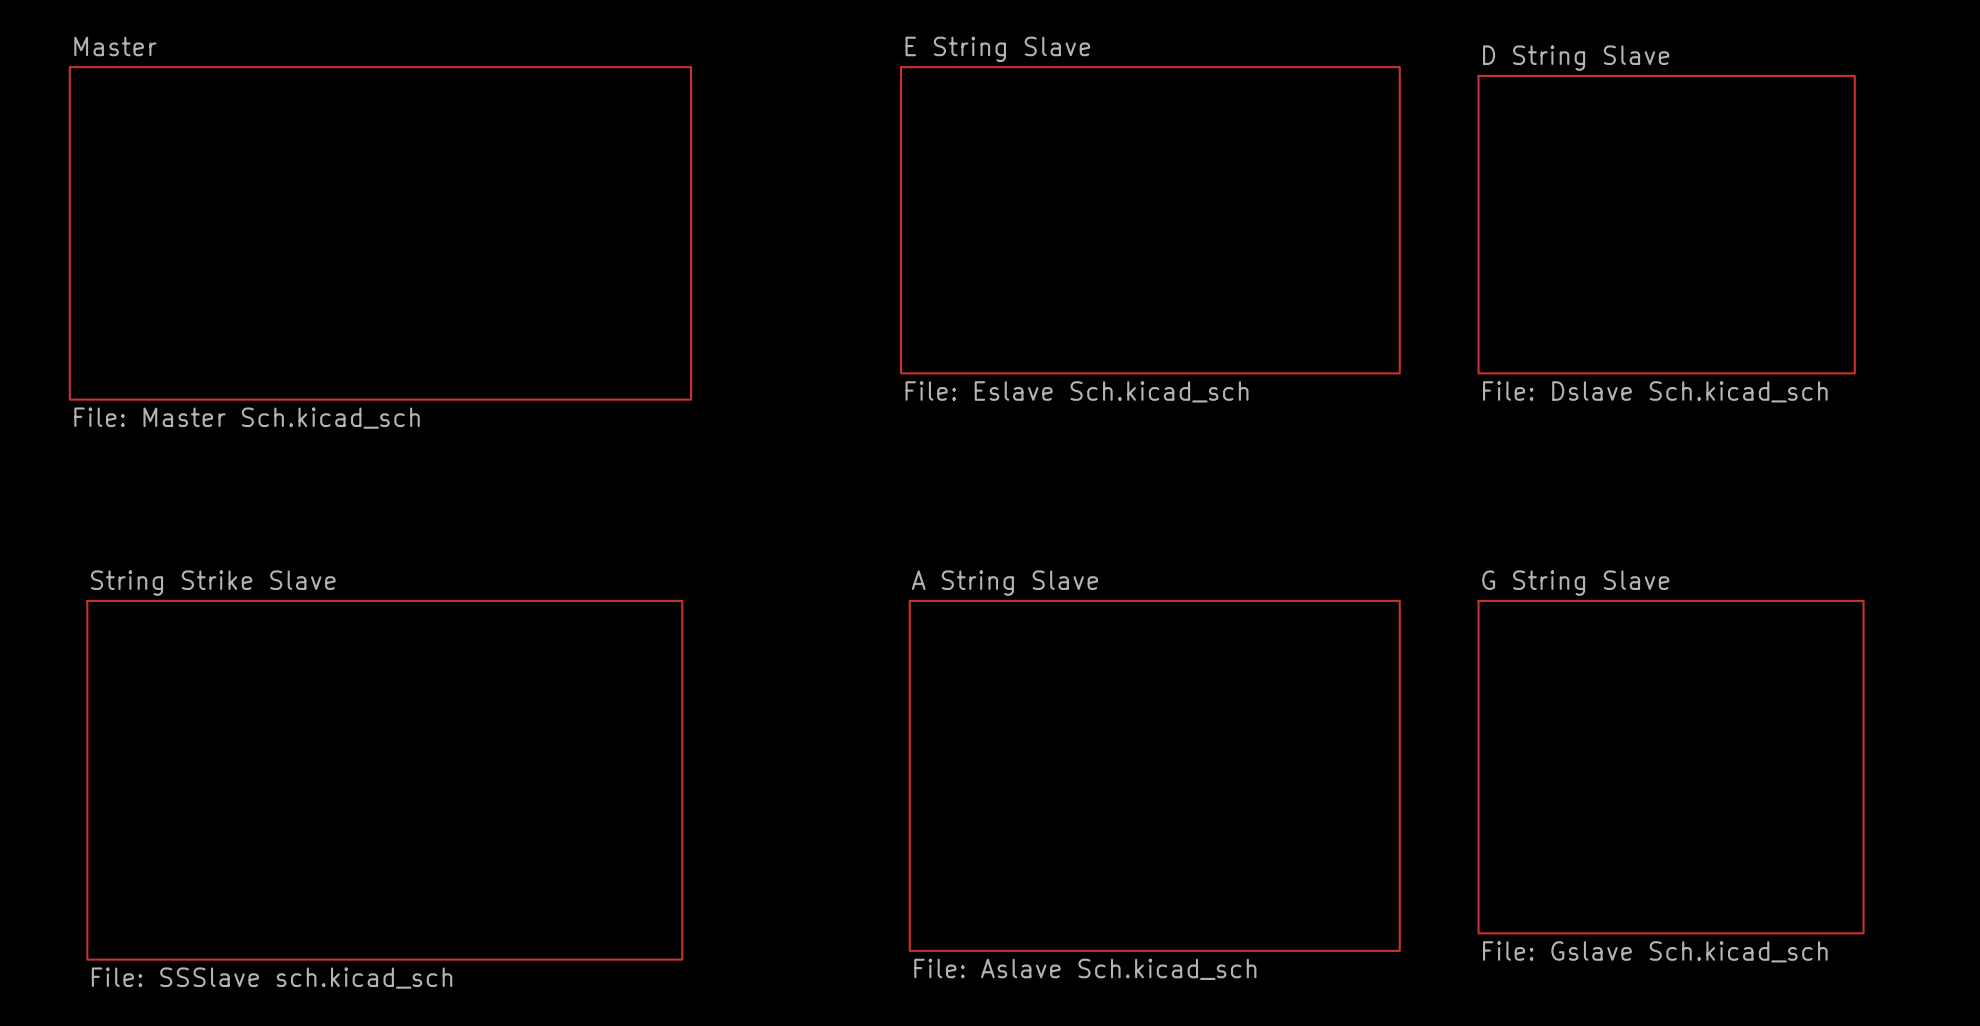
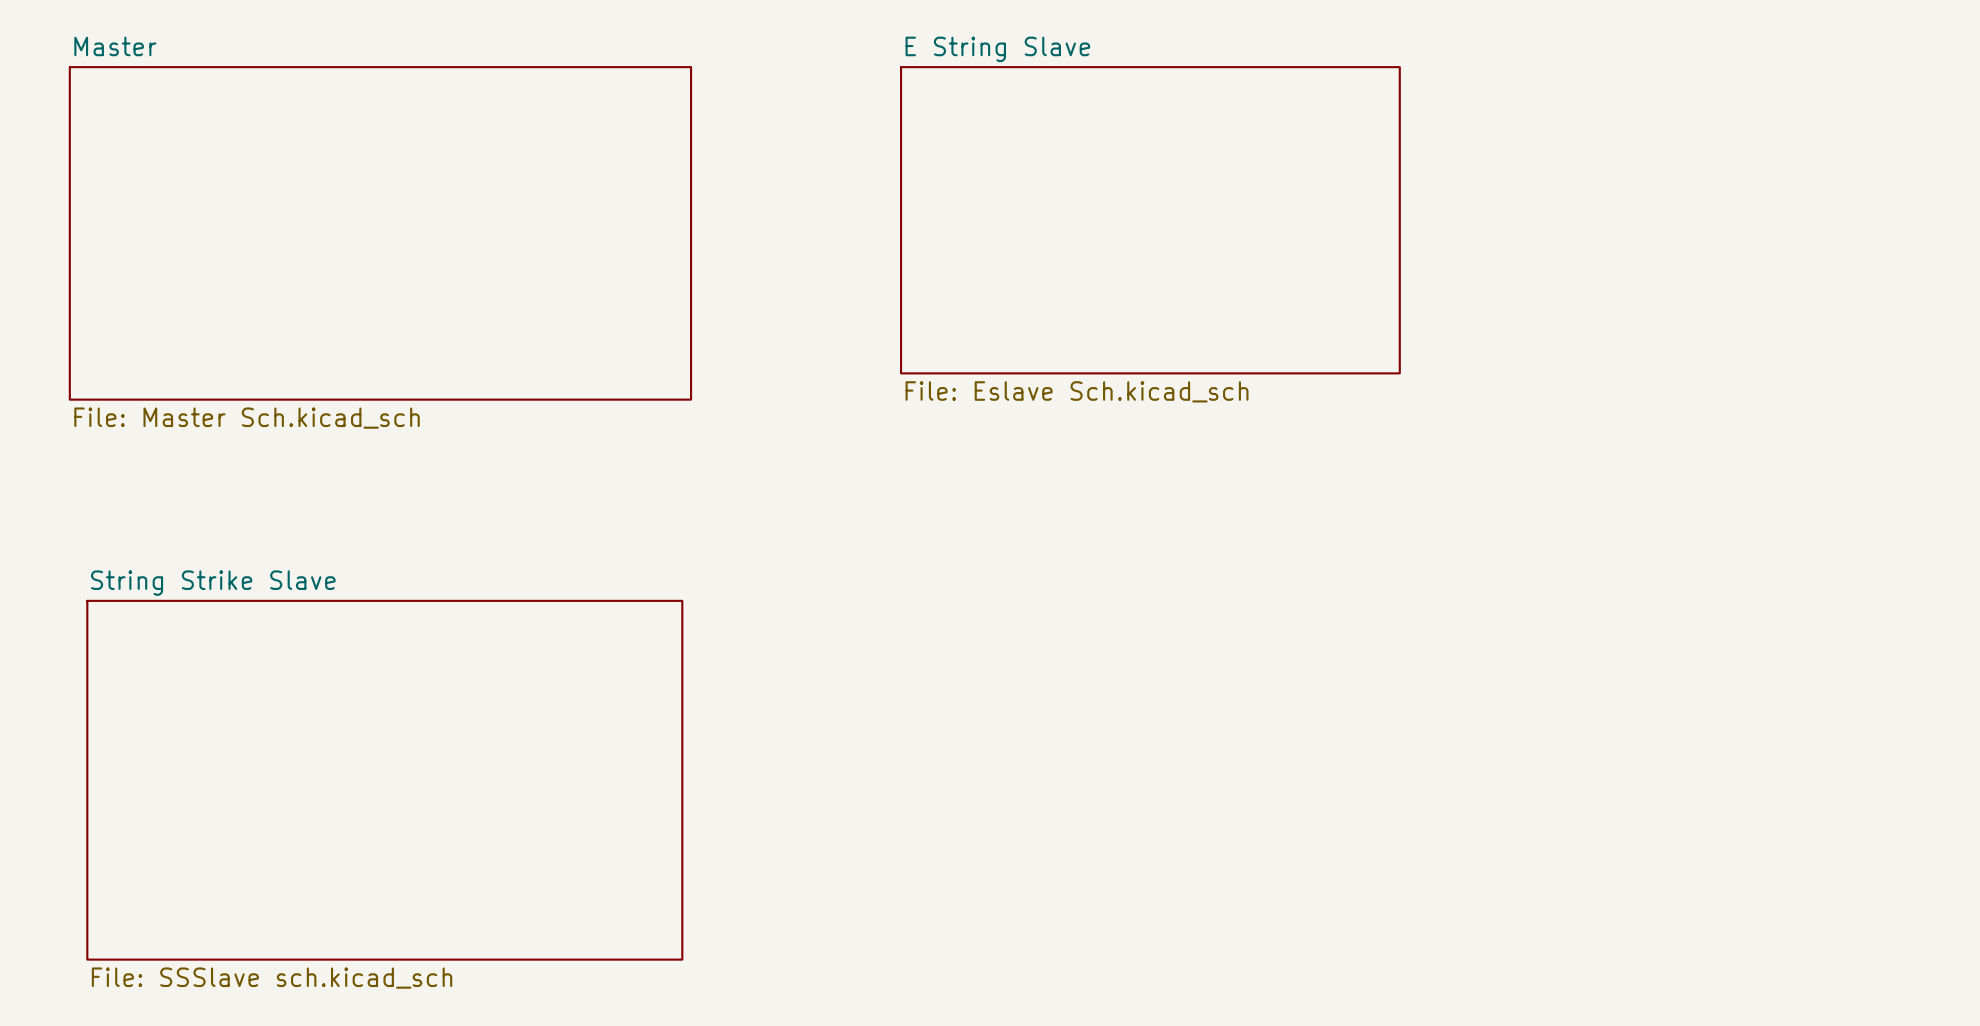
sheet D String Slave: File: Dslave Sch.kicad_sch (1666, 224) -> none
sheet G String Slave: File: Gslave Sch.kicad_sch (1671, 767) -> none
sheet A String Slave: File: Aslave Sch.kicad_sch (1154, 775) -> none

